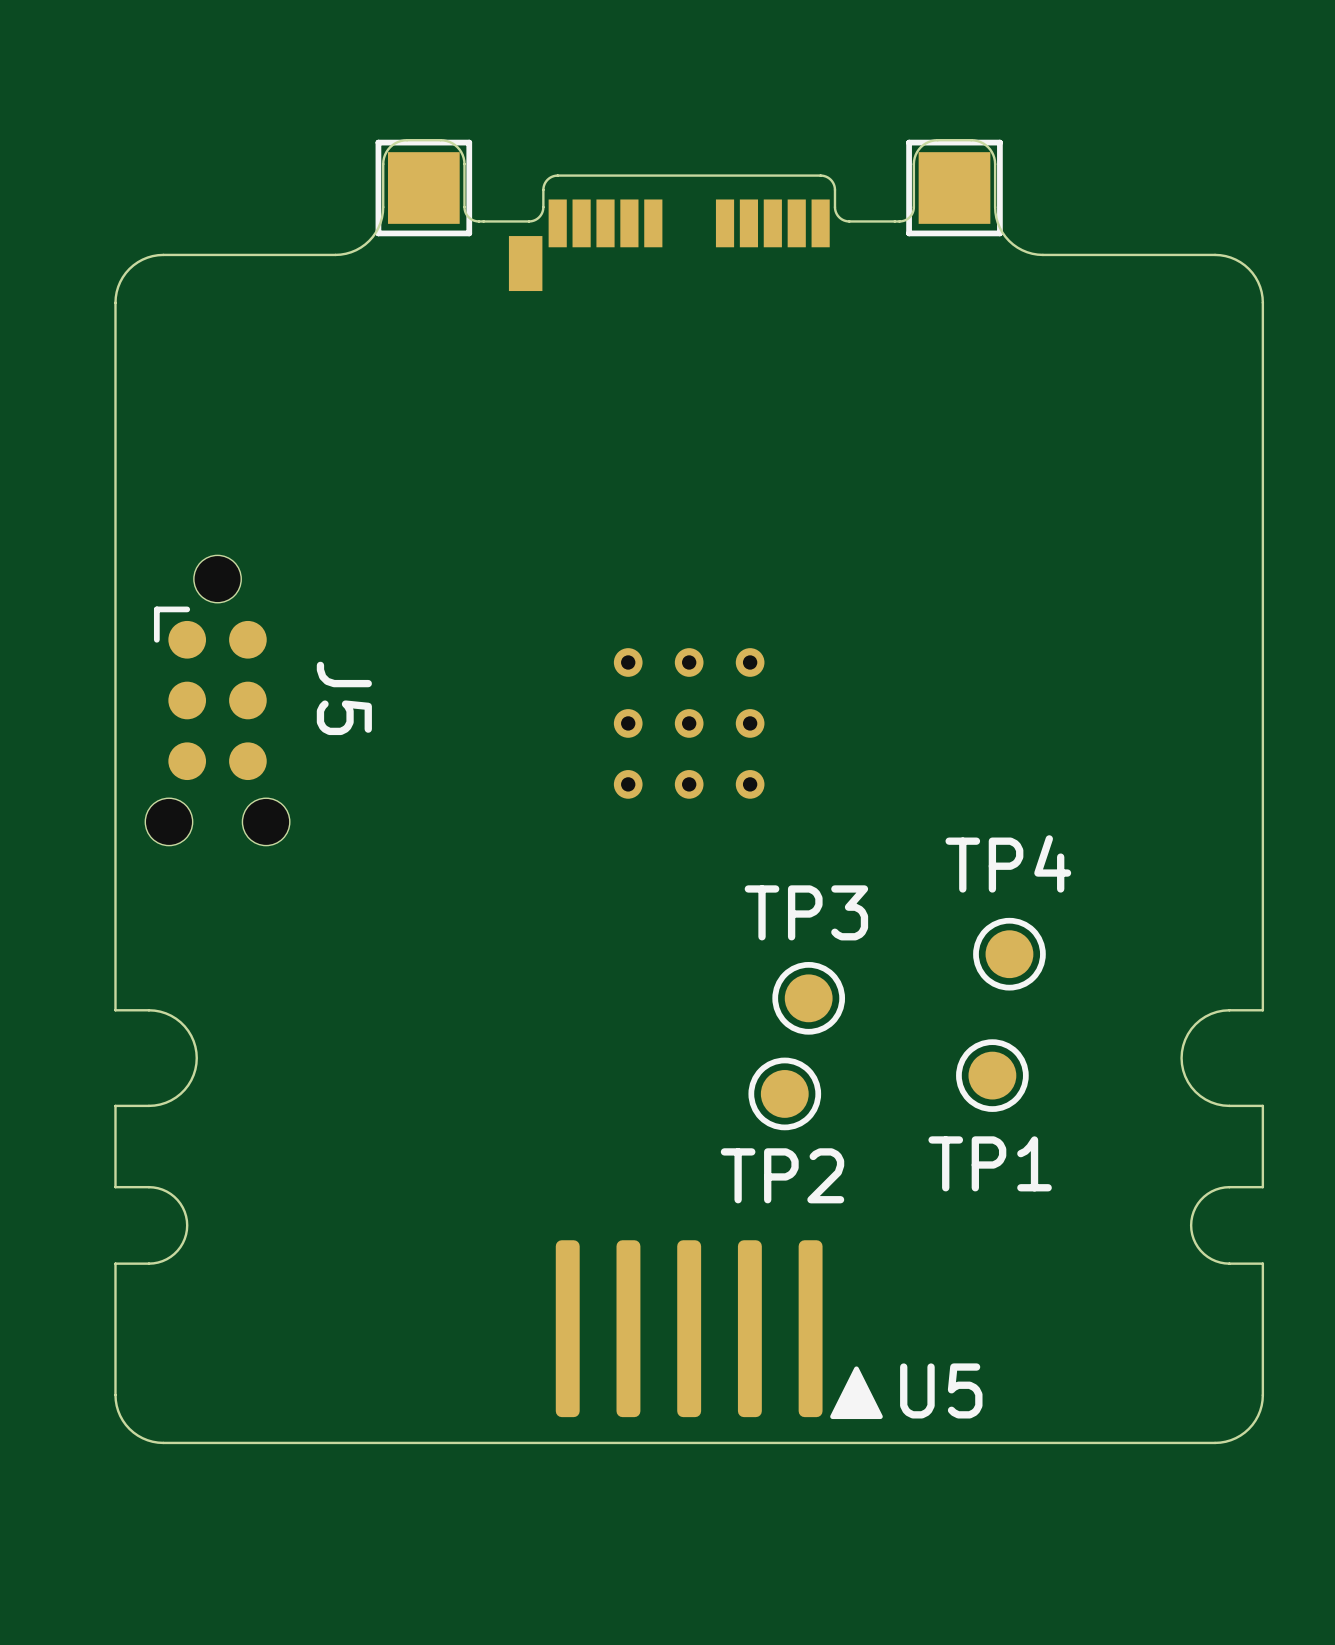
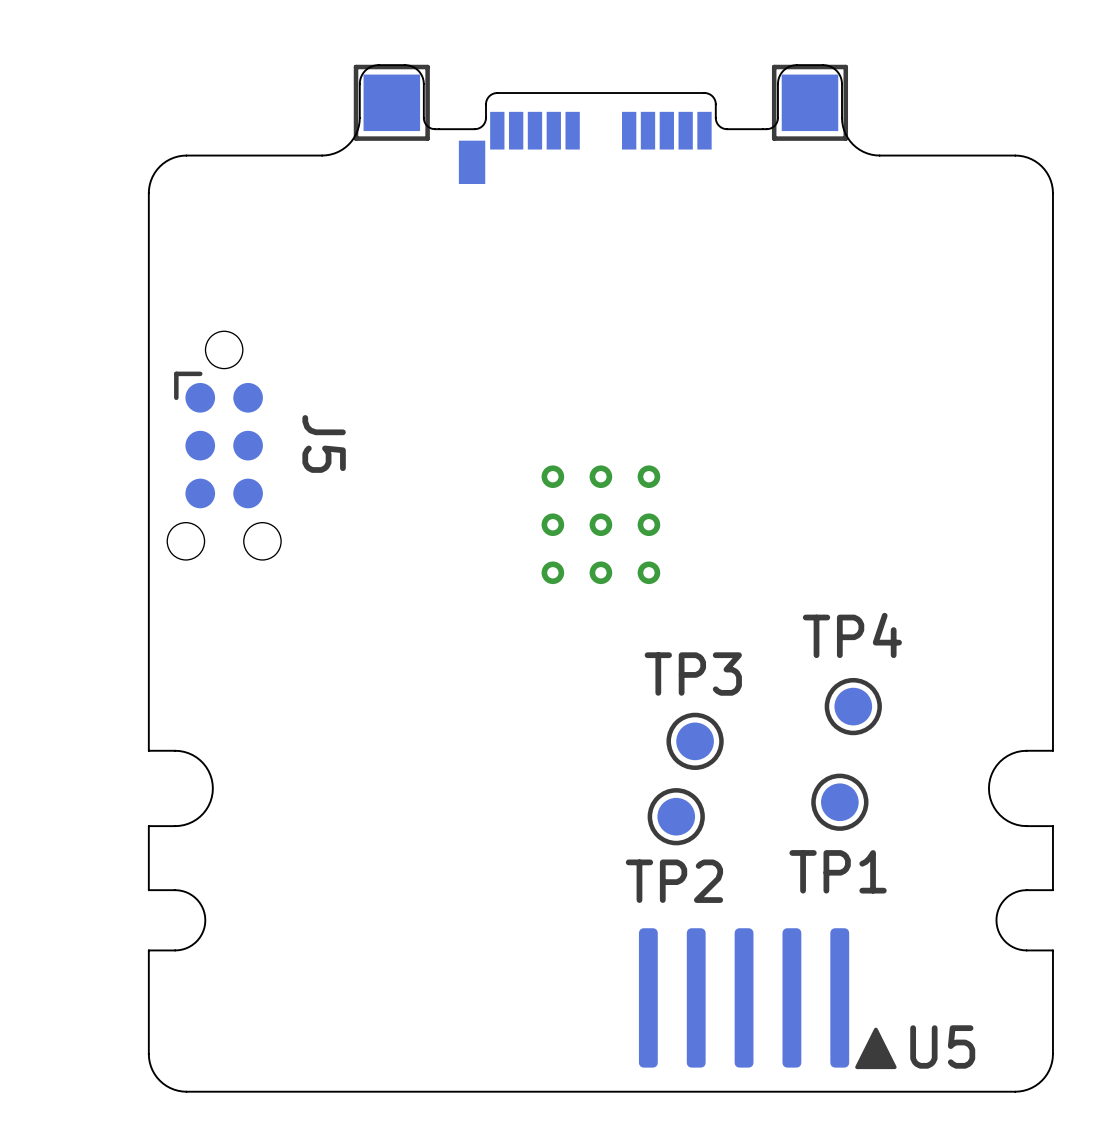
J5 position: (217, 700) -> (224, 445)
U5 position: (719, 1329) -> (767, 998)

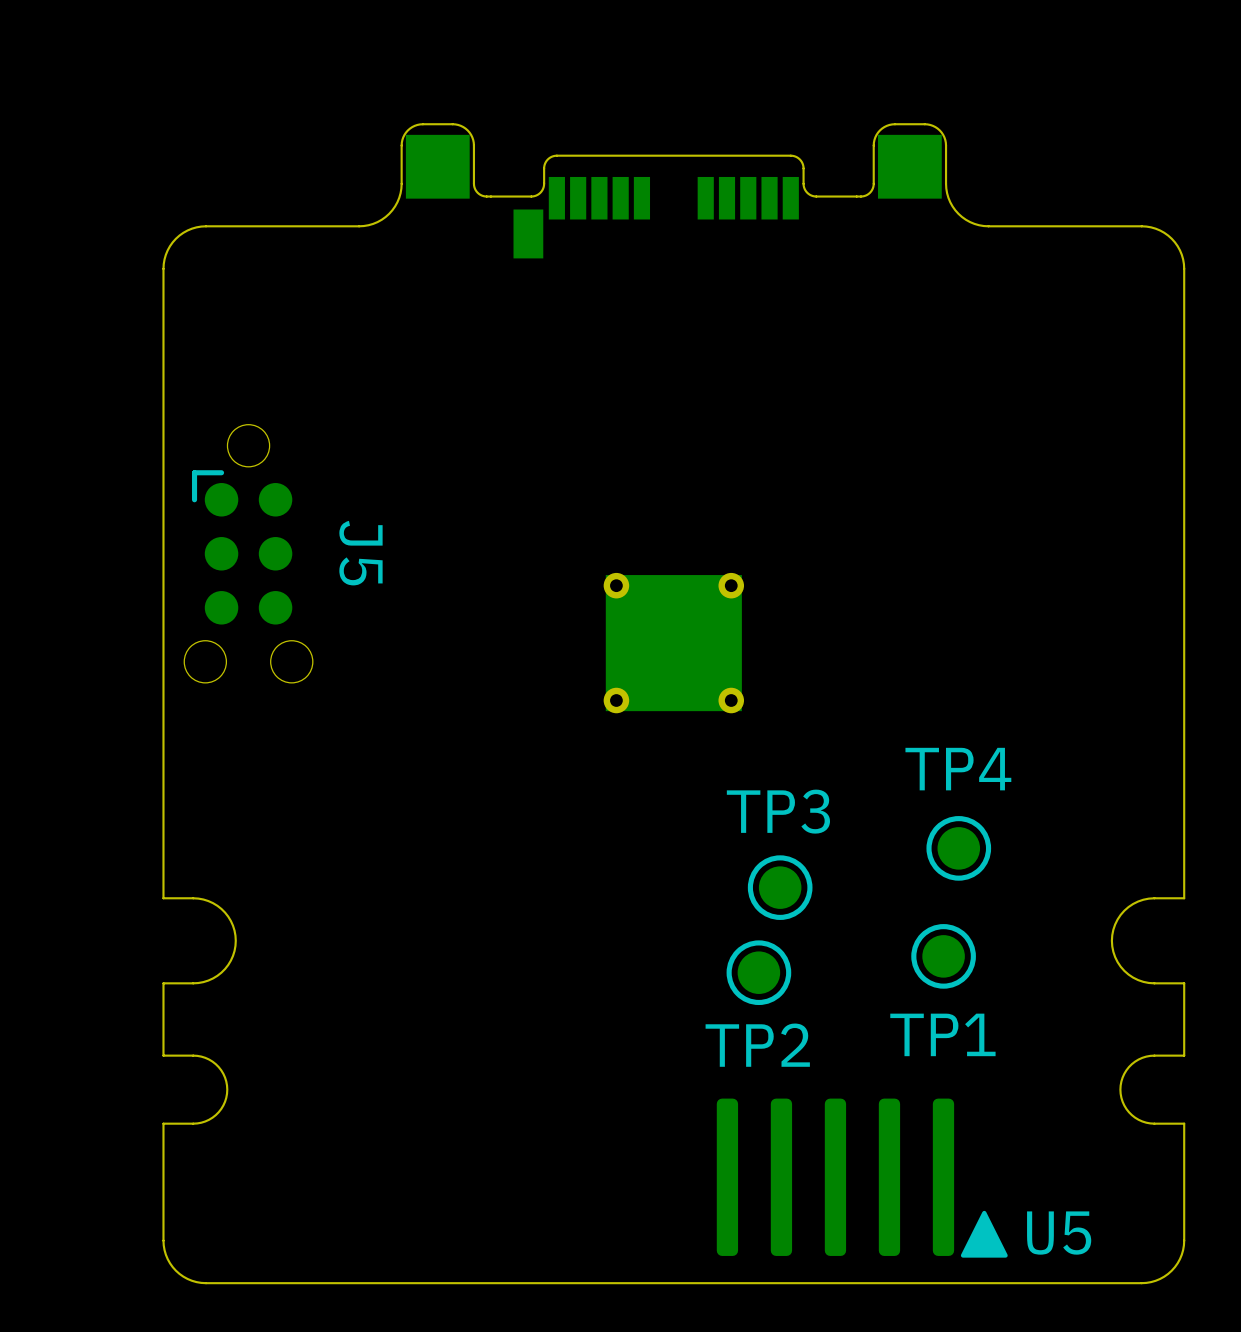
part footprint: [353, 64, 430, 141] -> [405, 134, 470, 199]
part footprint: [771, 64, 849, 141] -> [877, 134, 942, 199]
part footprint: [541, 465, 661, 585] -> [603, 572, 745, 714]

